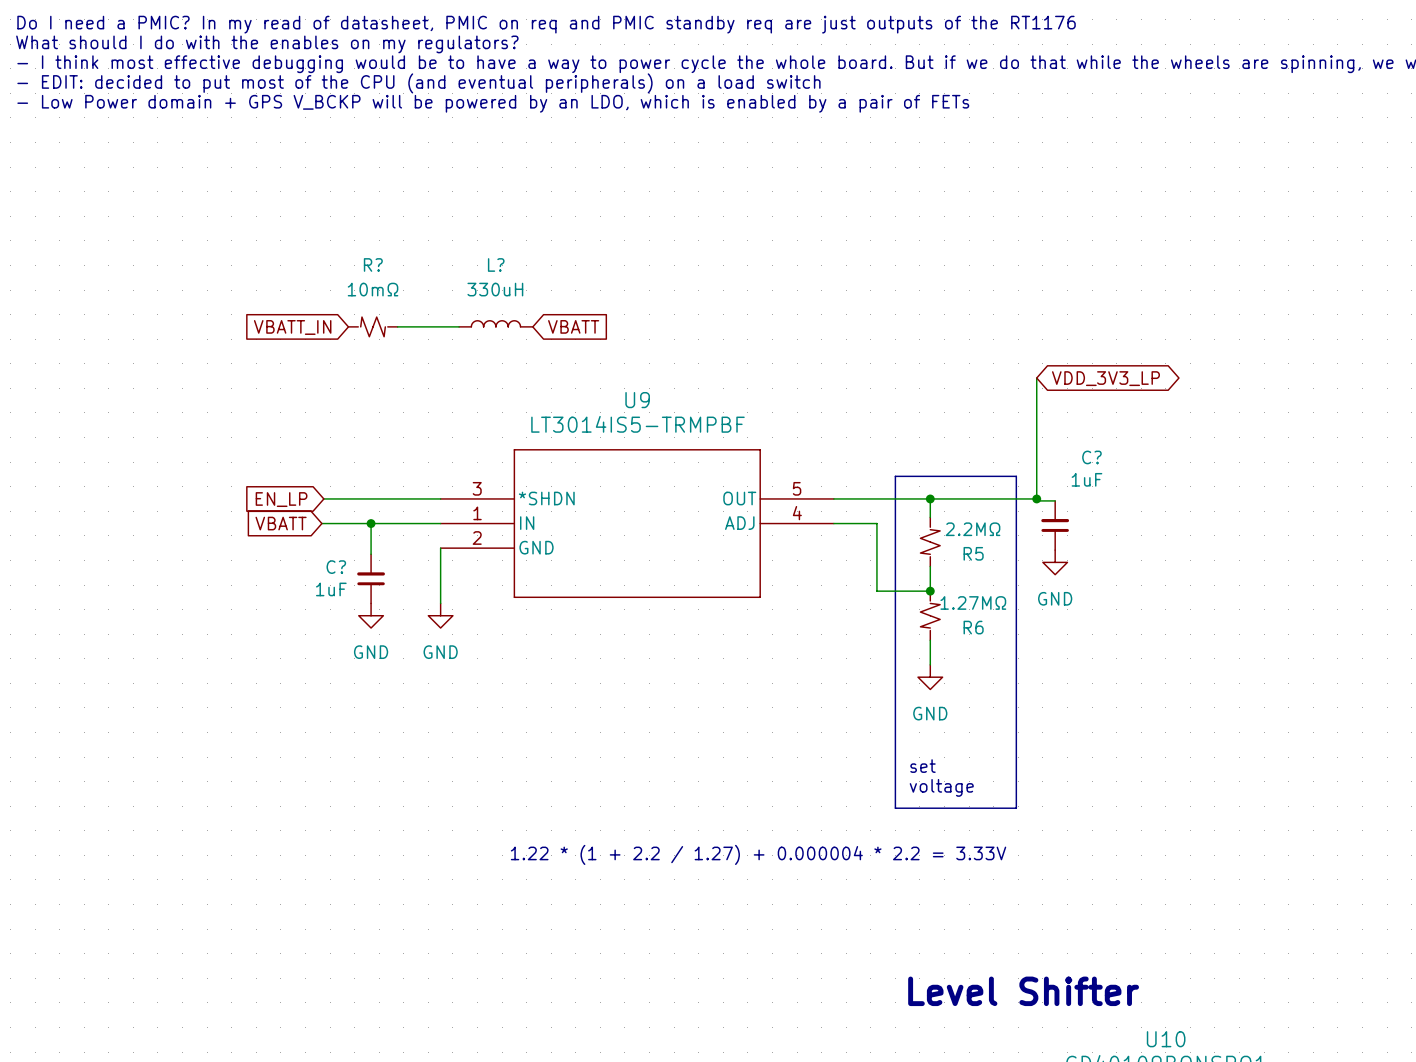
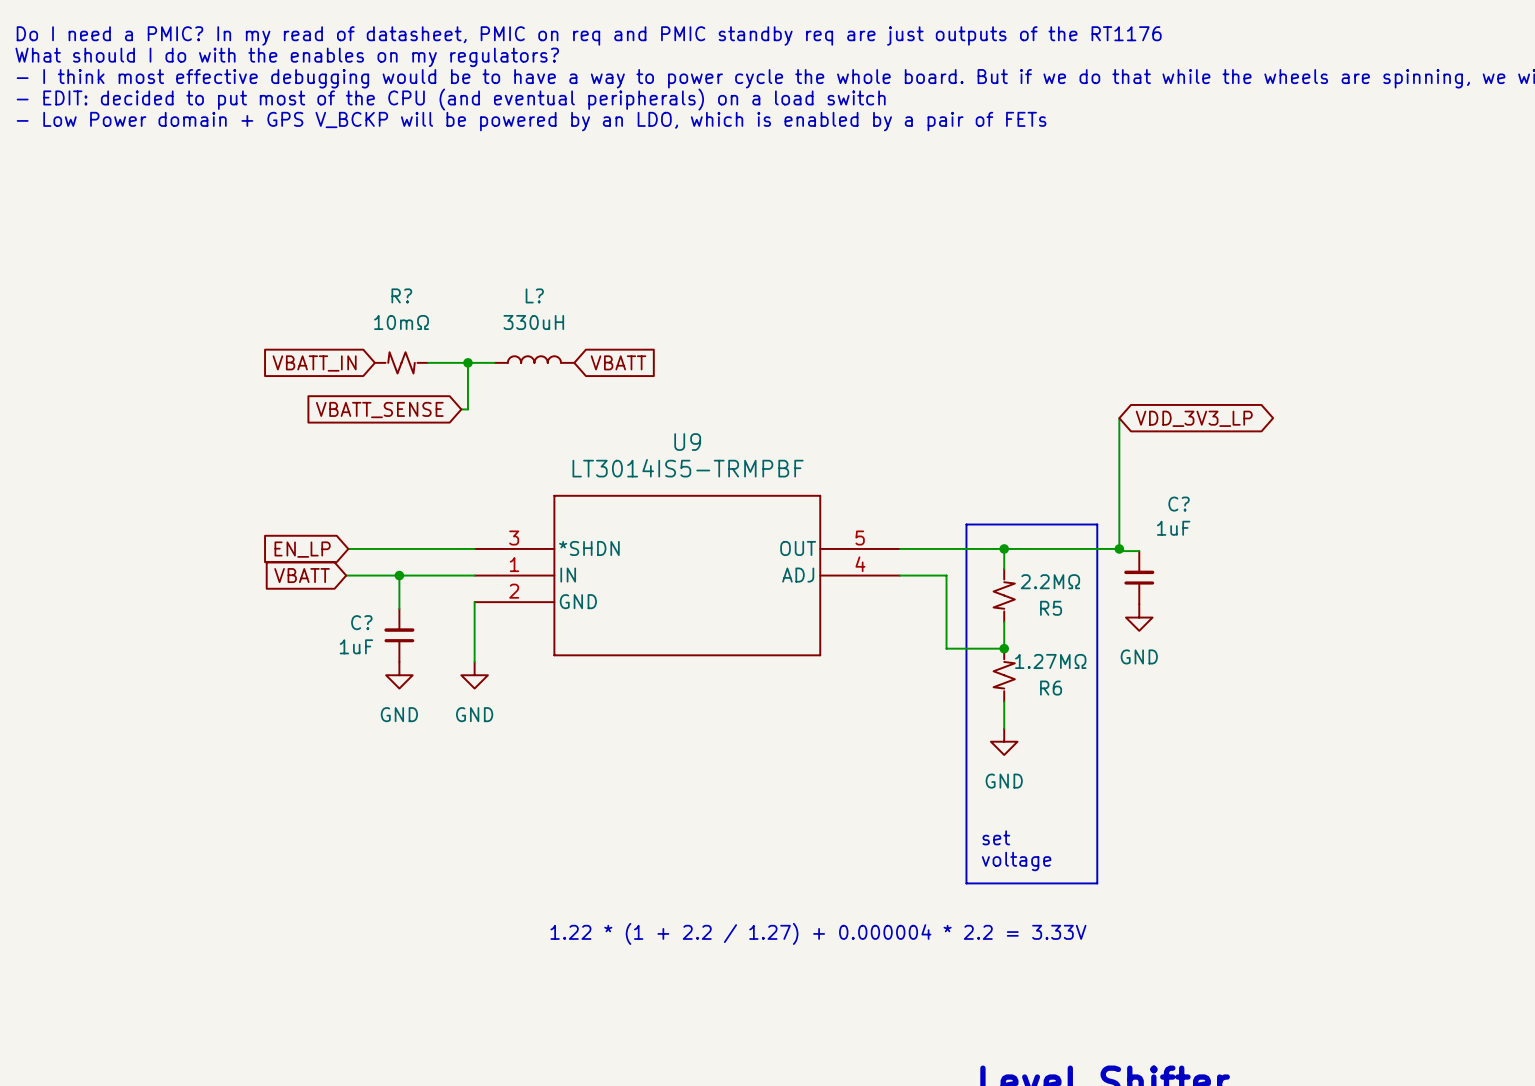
wire: none -> (467, 362) (467, 409) (461, 409)
junction: none -> (467, 362)
global label: none -> VBATT_SENSE (379, 410)

